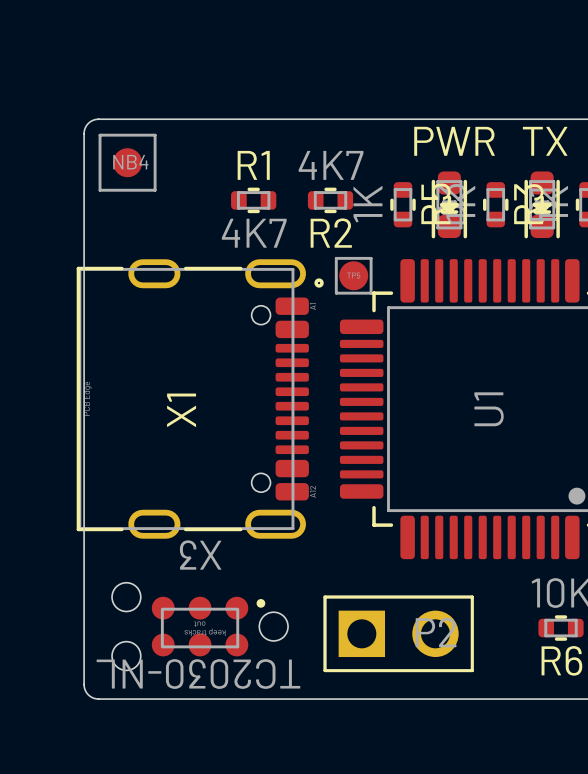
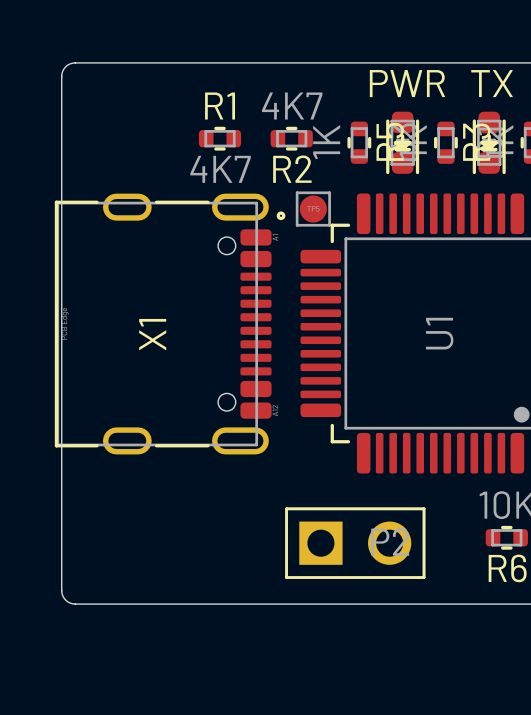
NB4: (127, 162) -> none
X3: TC2030-NL (200, 626) -> none

